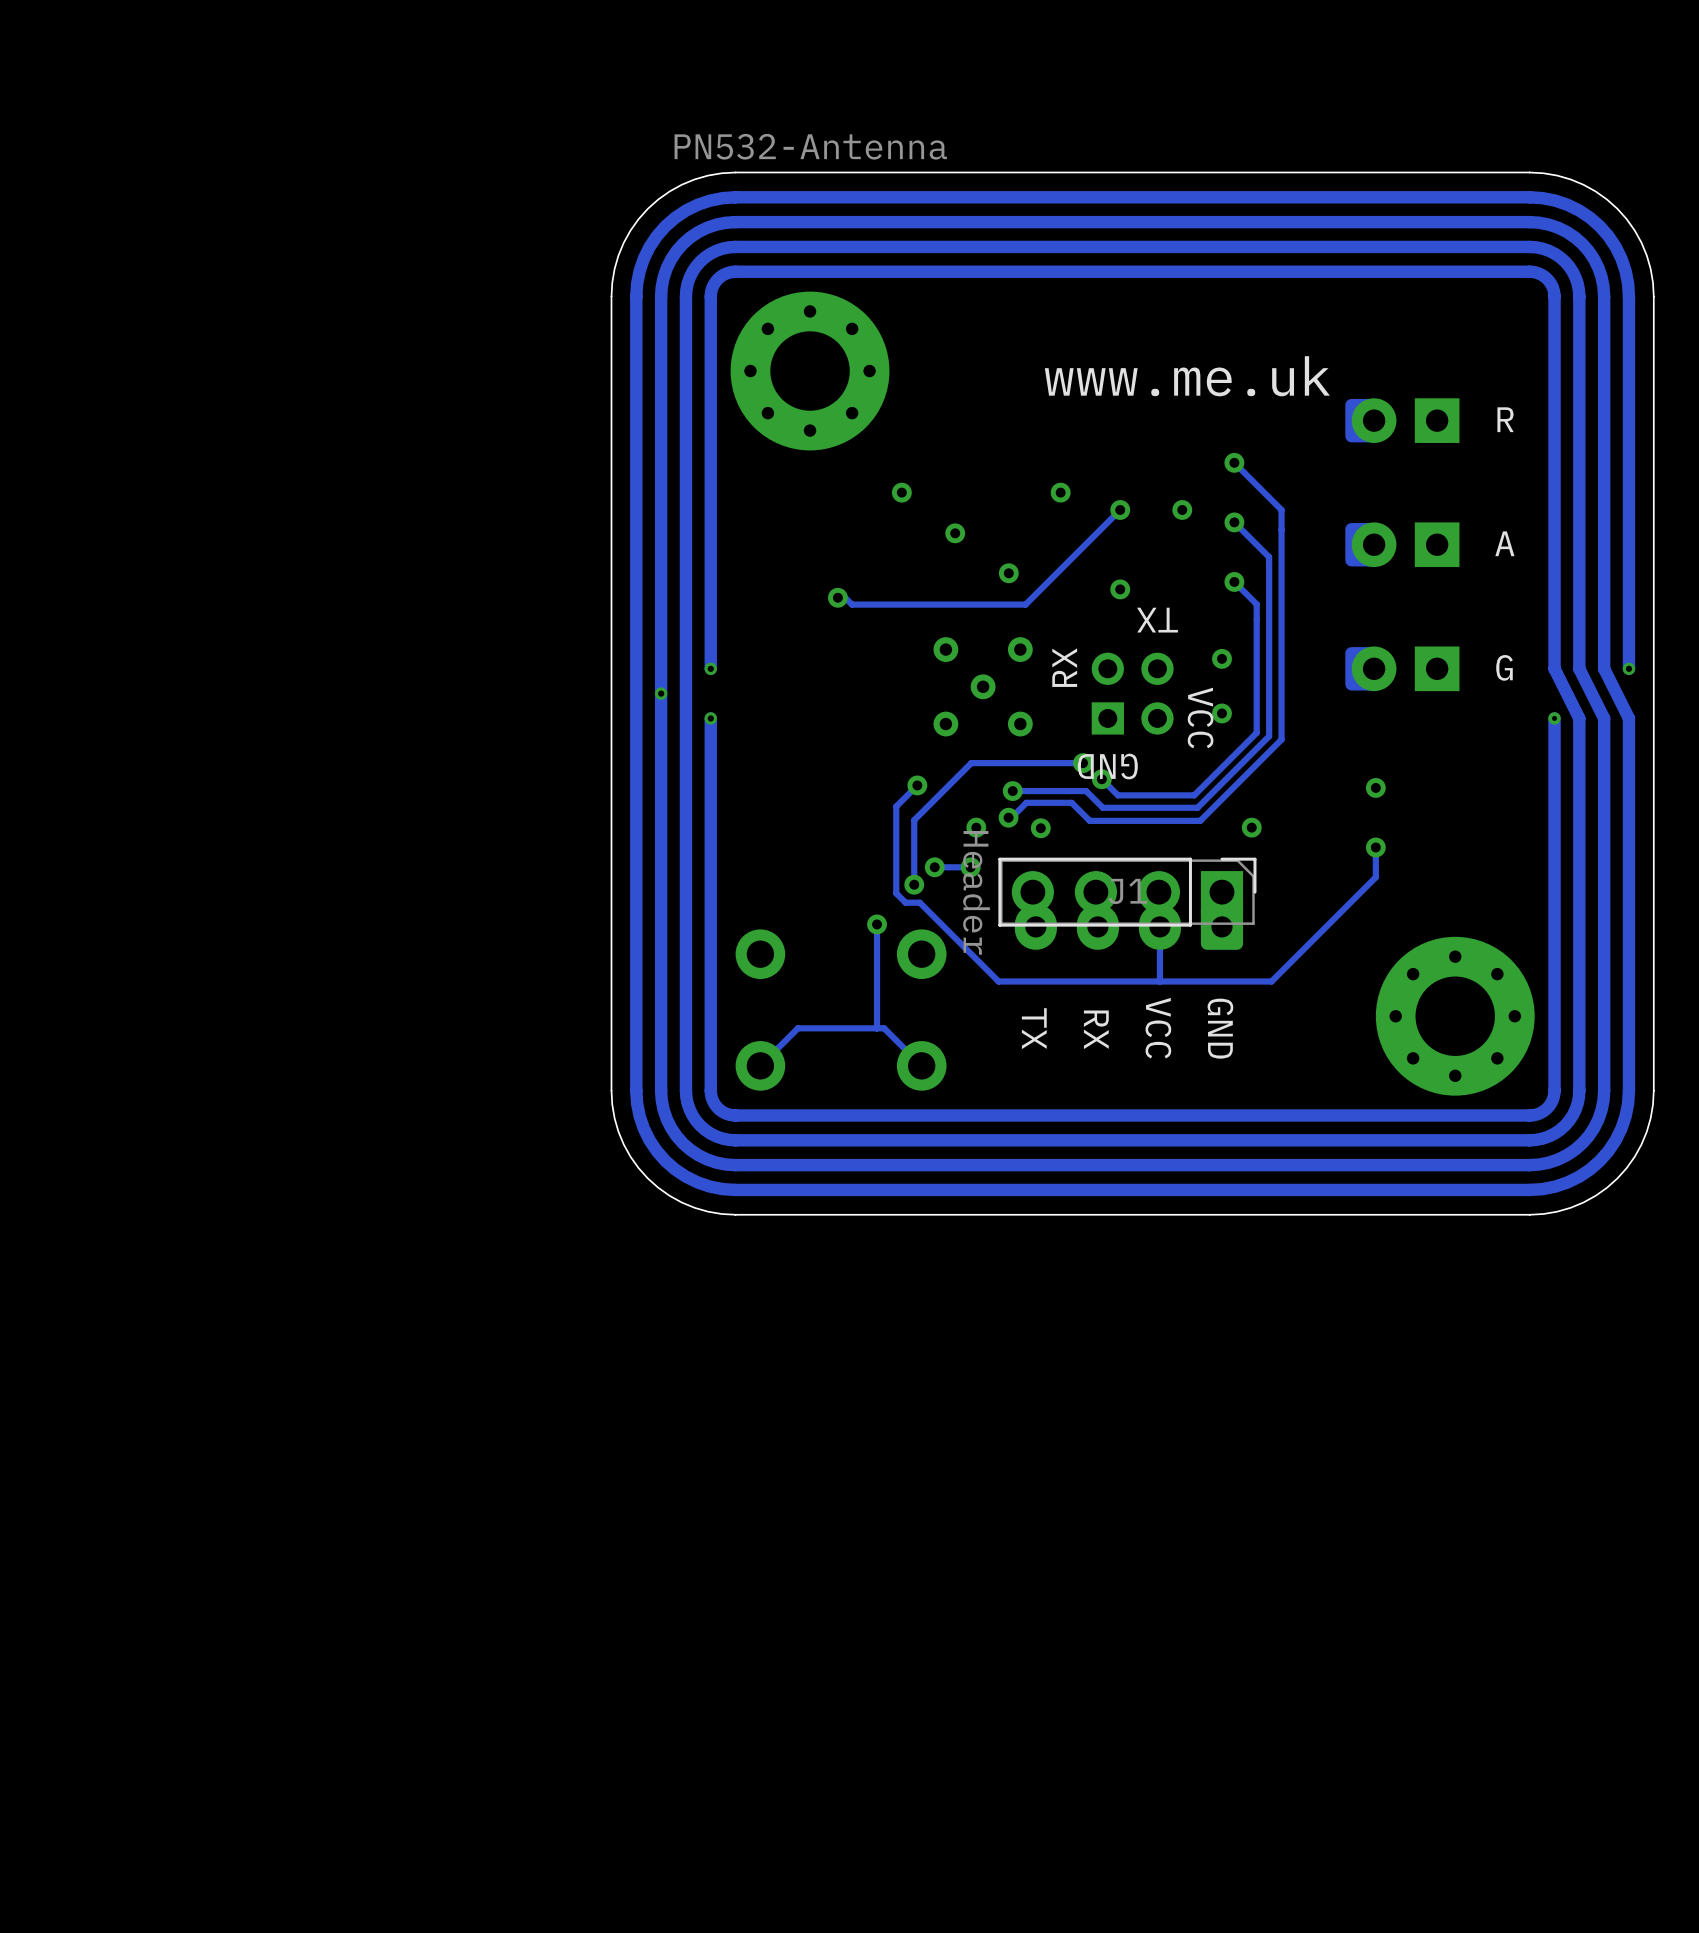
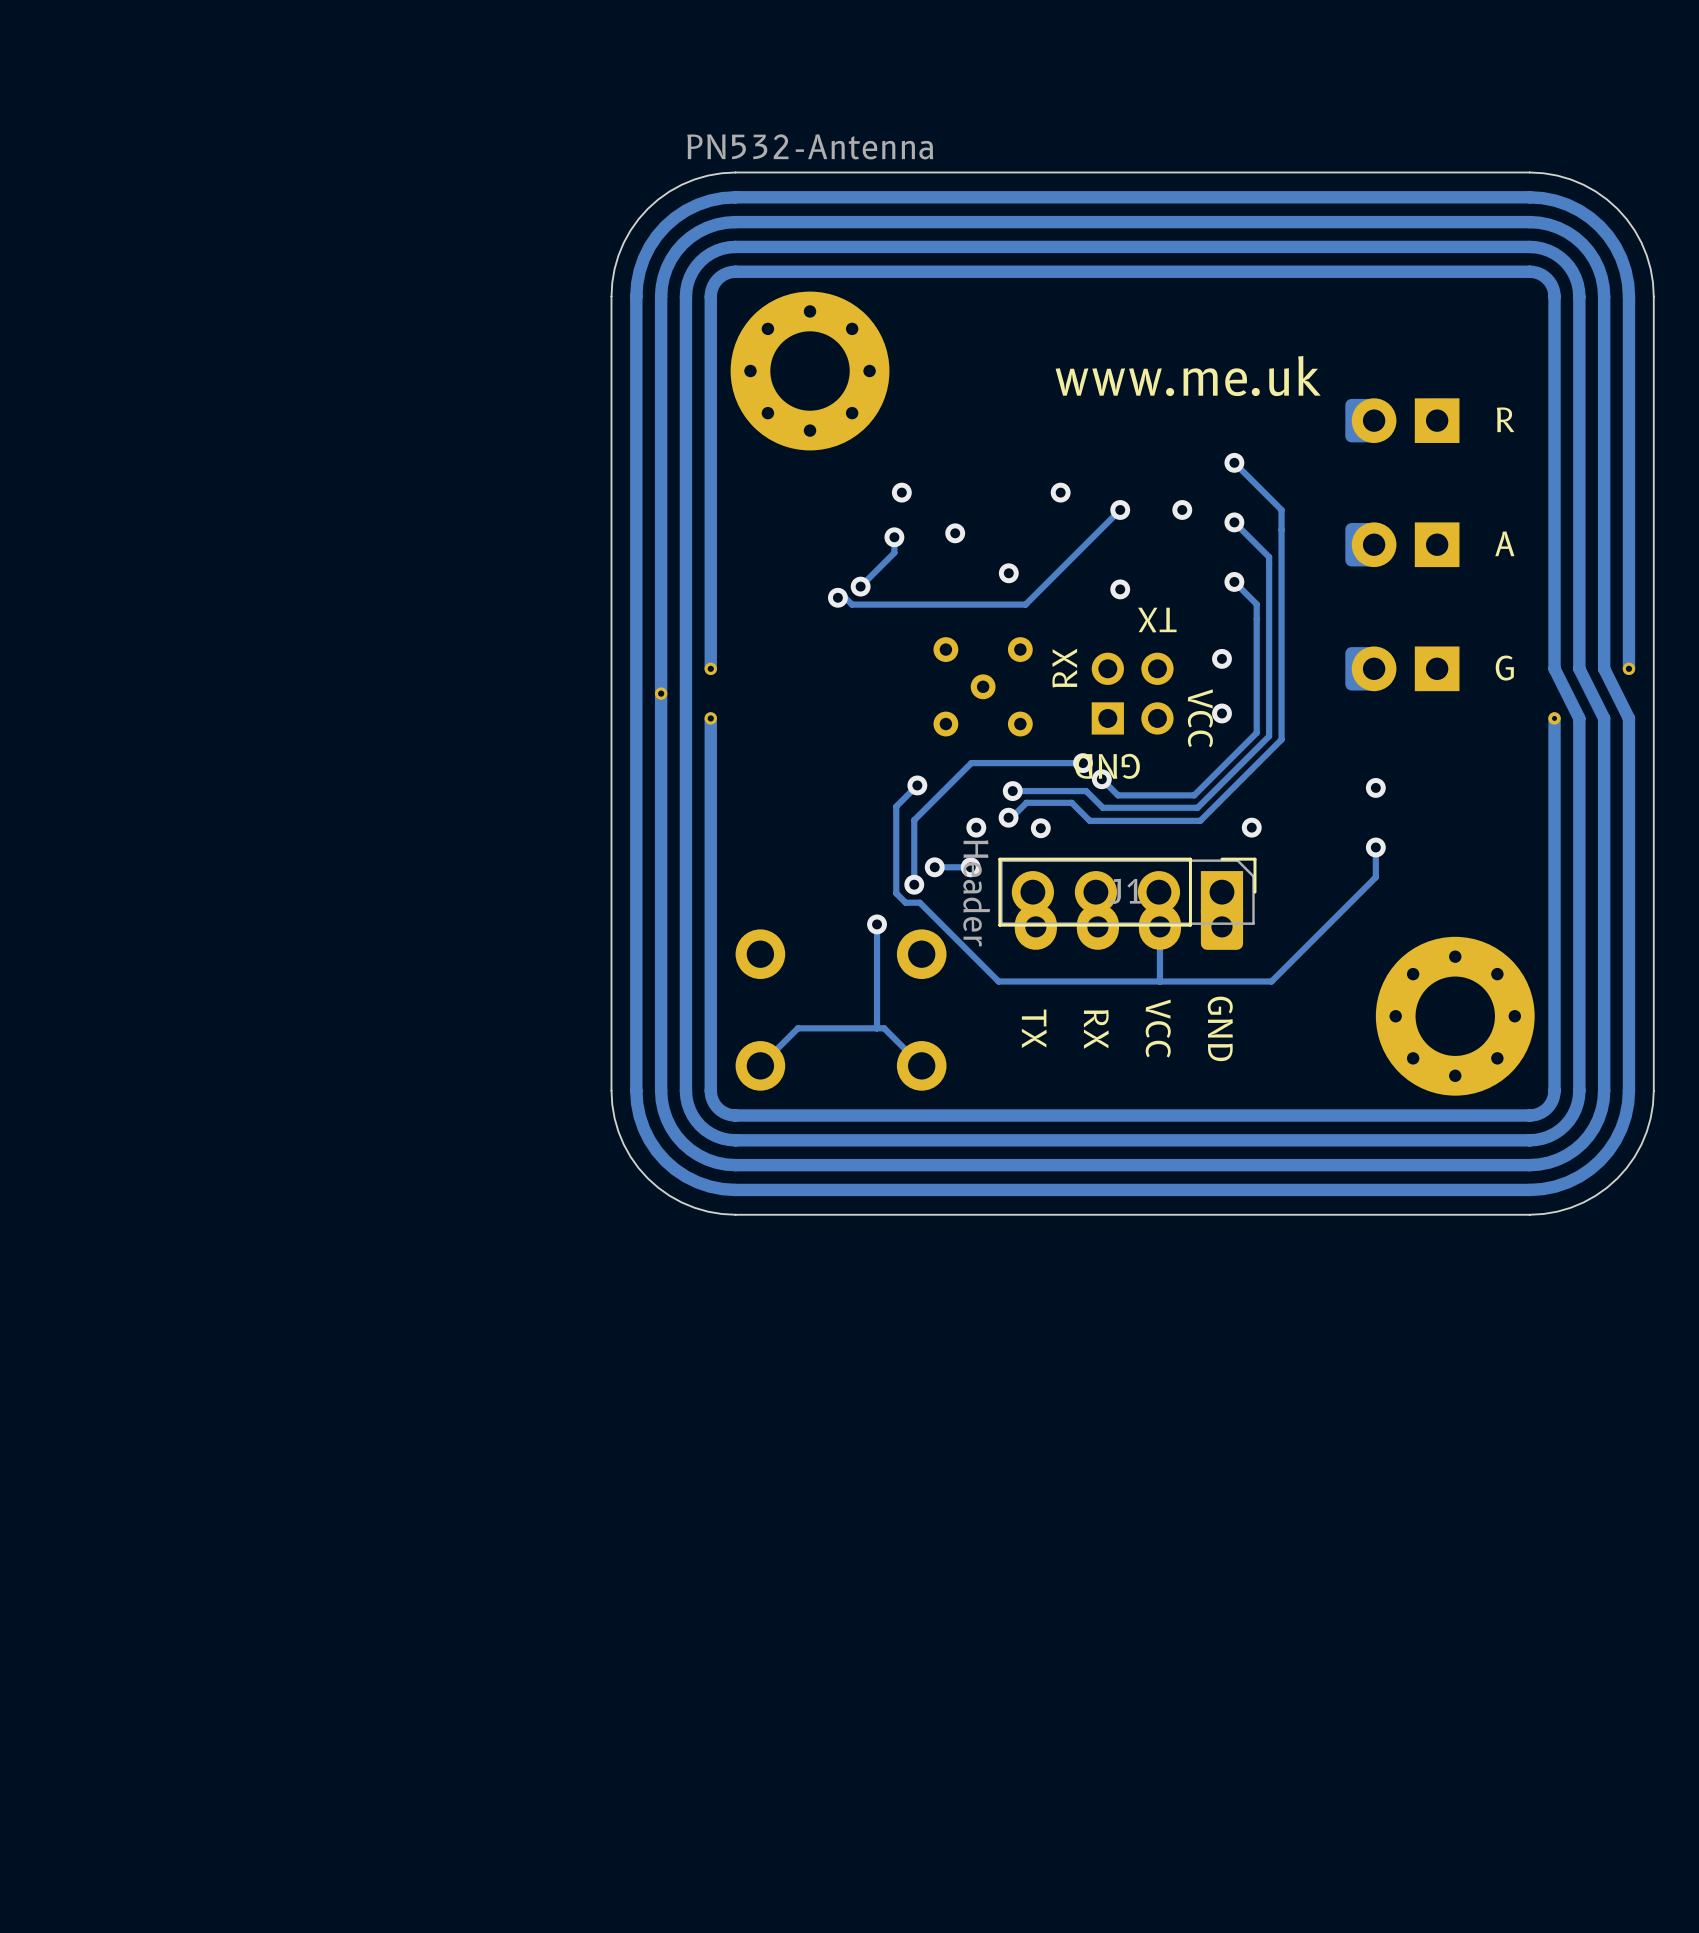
track: none -> (894, 537) (894, 552) (860, 586)
via: none -> (894, 537)
via: none -> (860, 586)

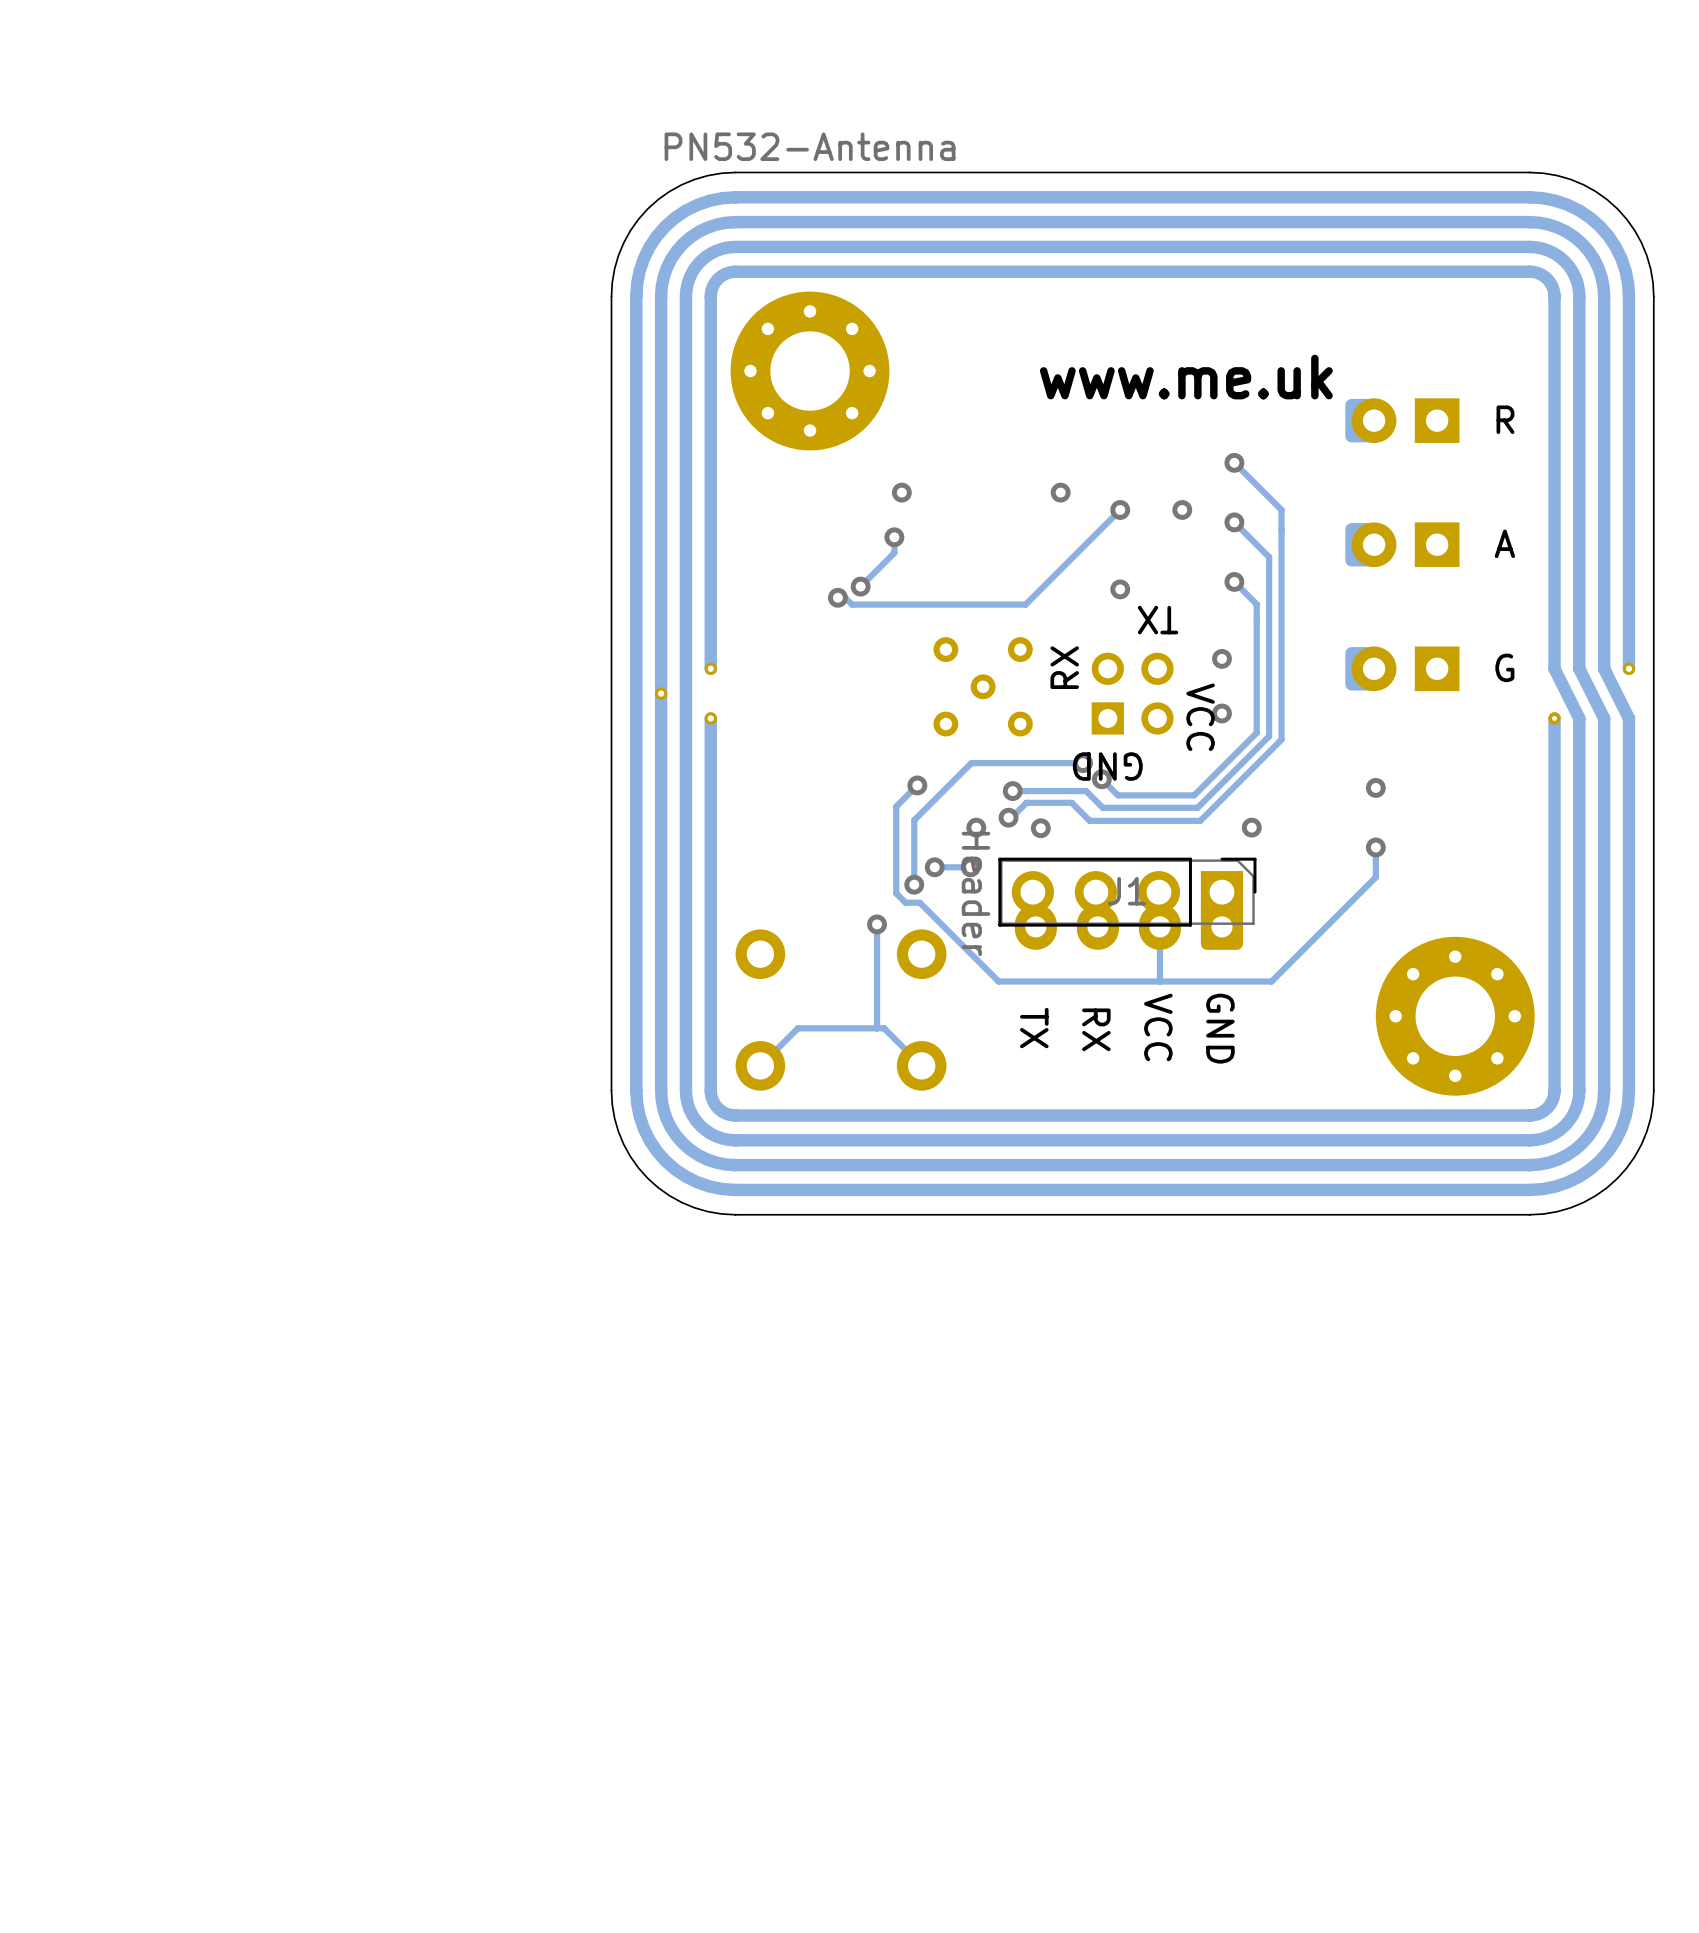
via: (955, 533) -> none
via: (1008, 573) -> none

